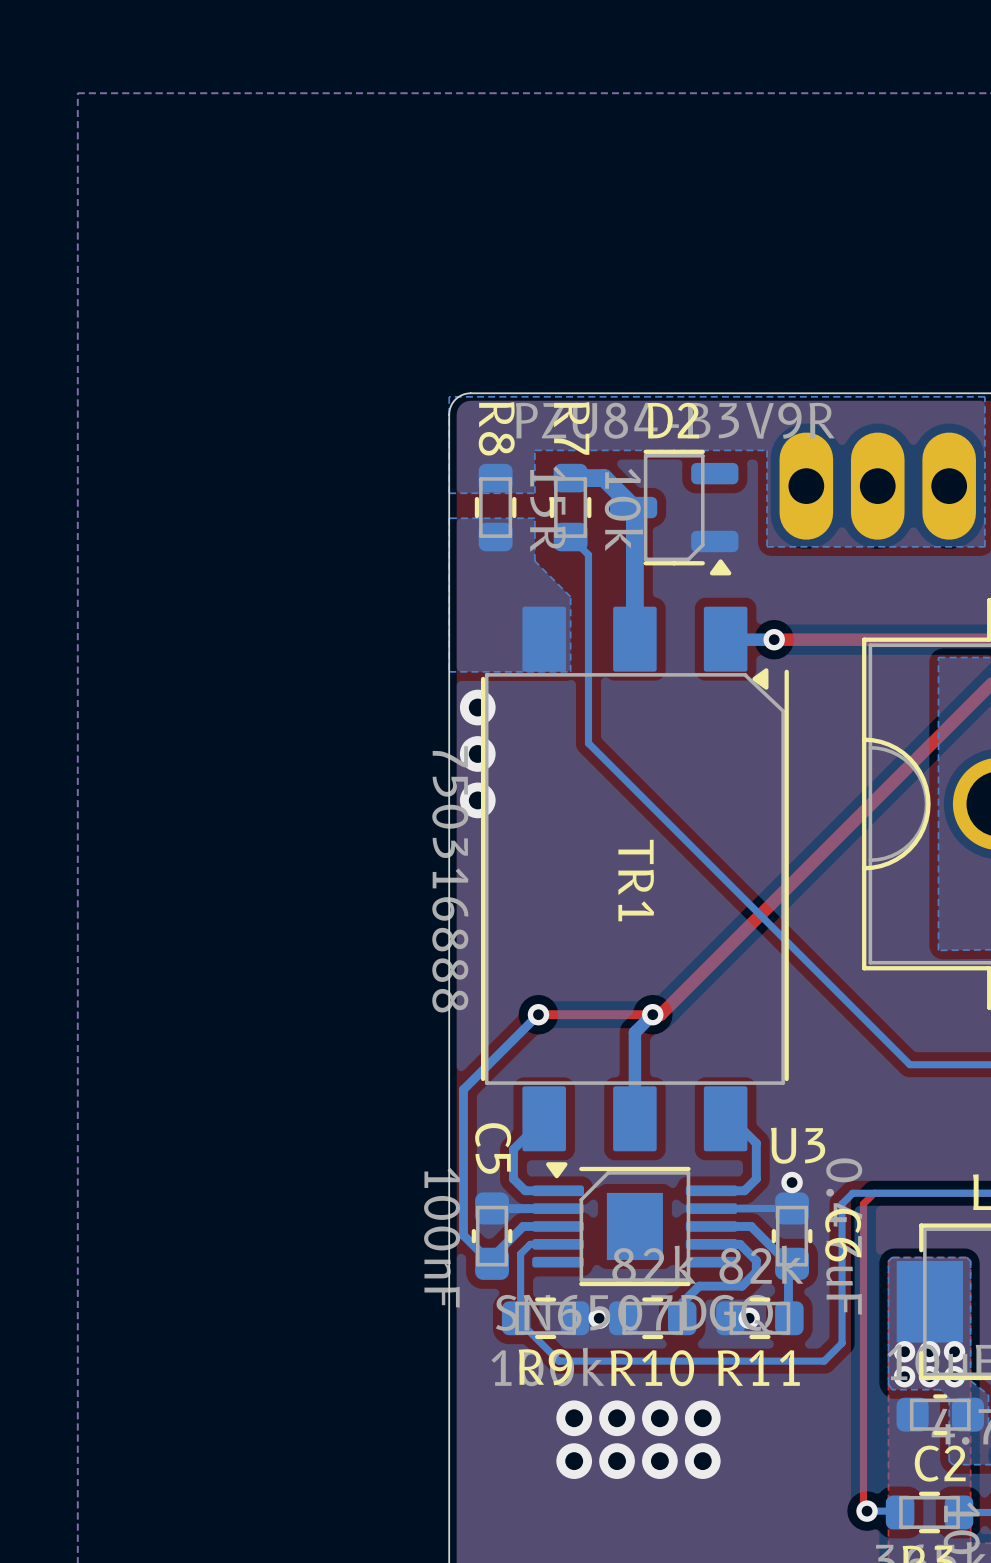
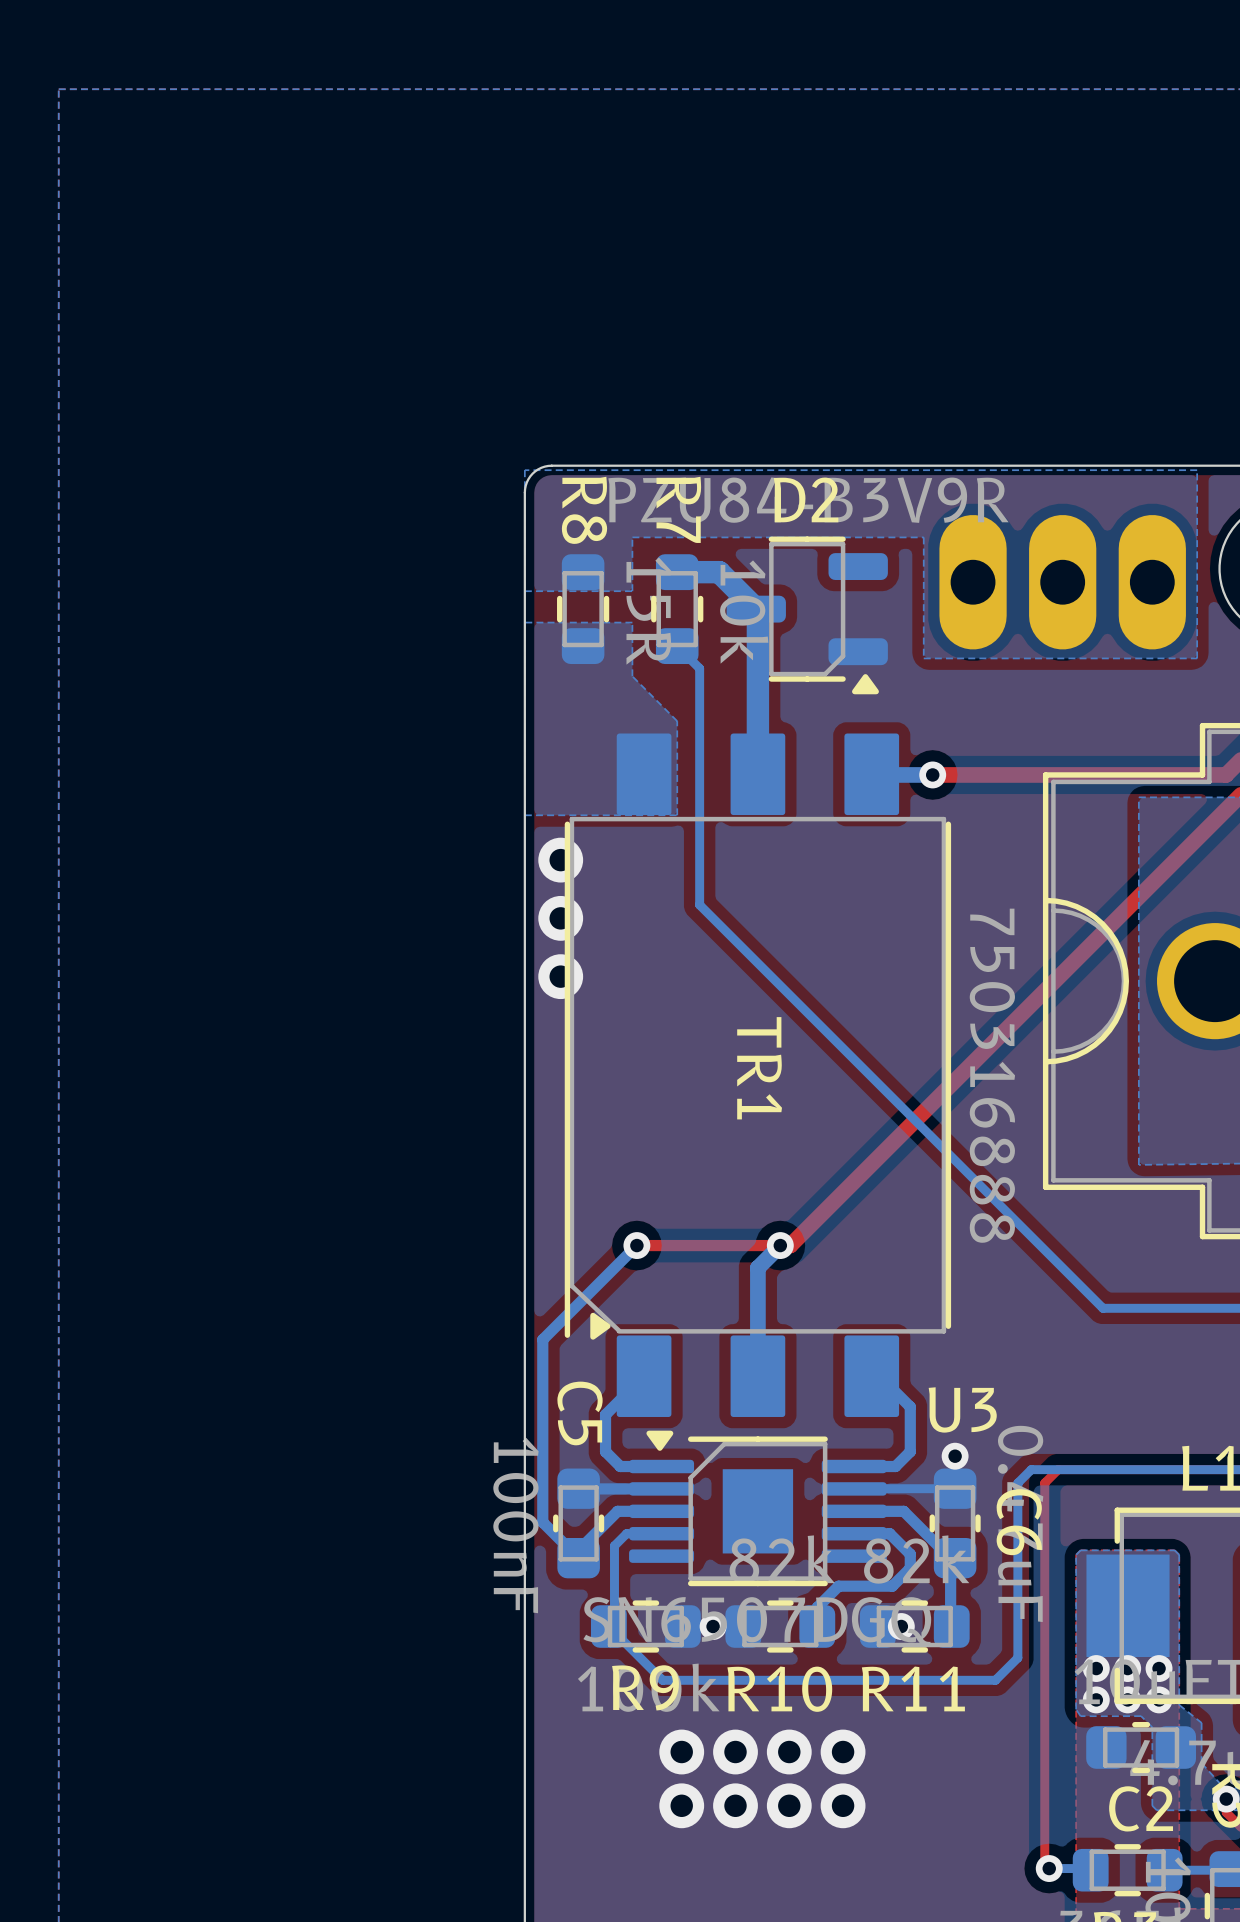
TR1 rotation: 0° (634, 878) -> 180° (757, 1075)

